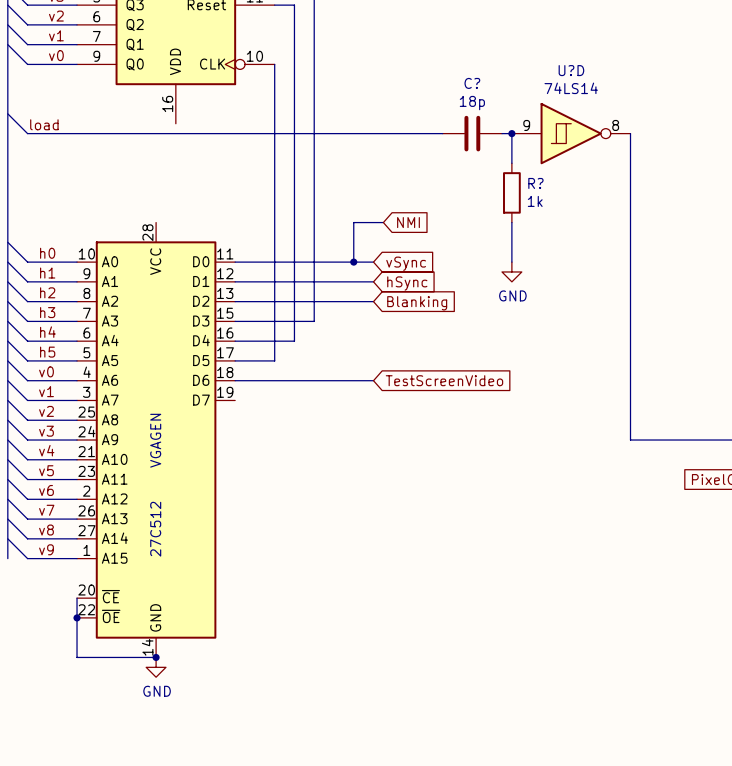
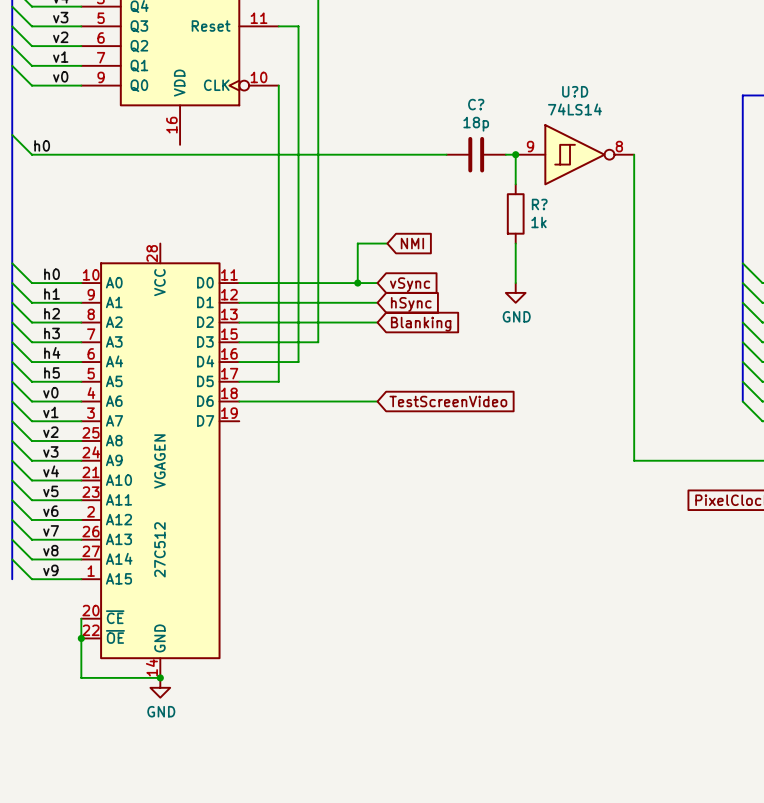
label: load (44, 124) -> h0 (42, 145)

